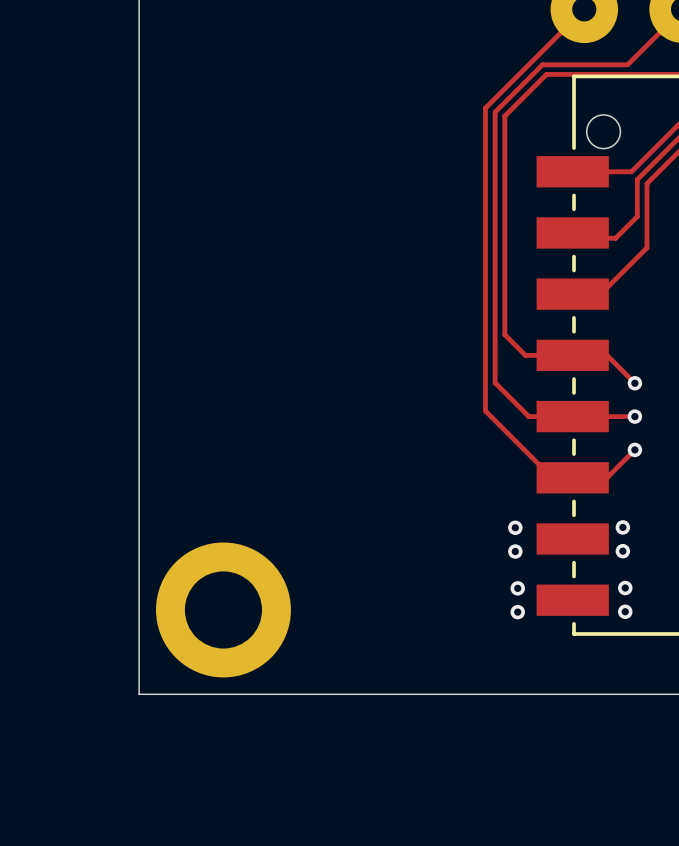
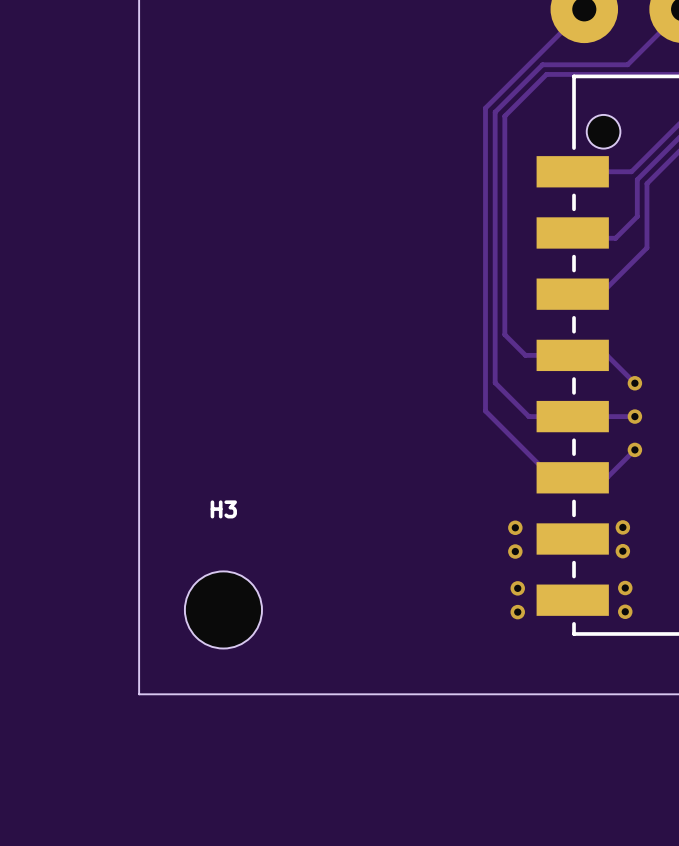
part: (223, 609) -> none
H3: none -> (223, 609)

